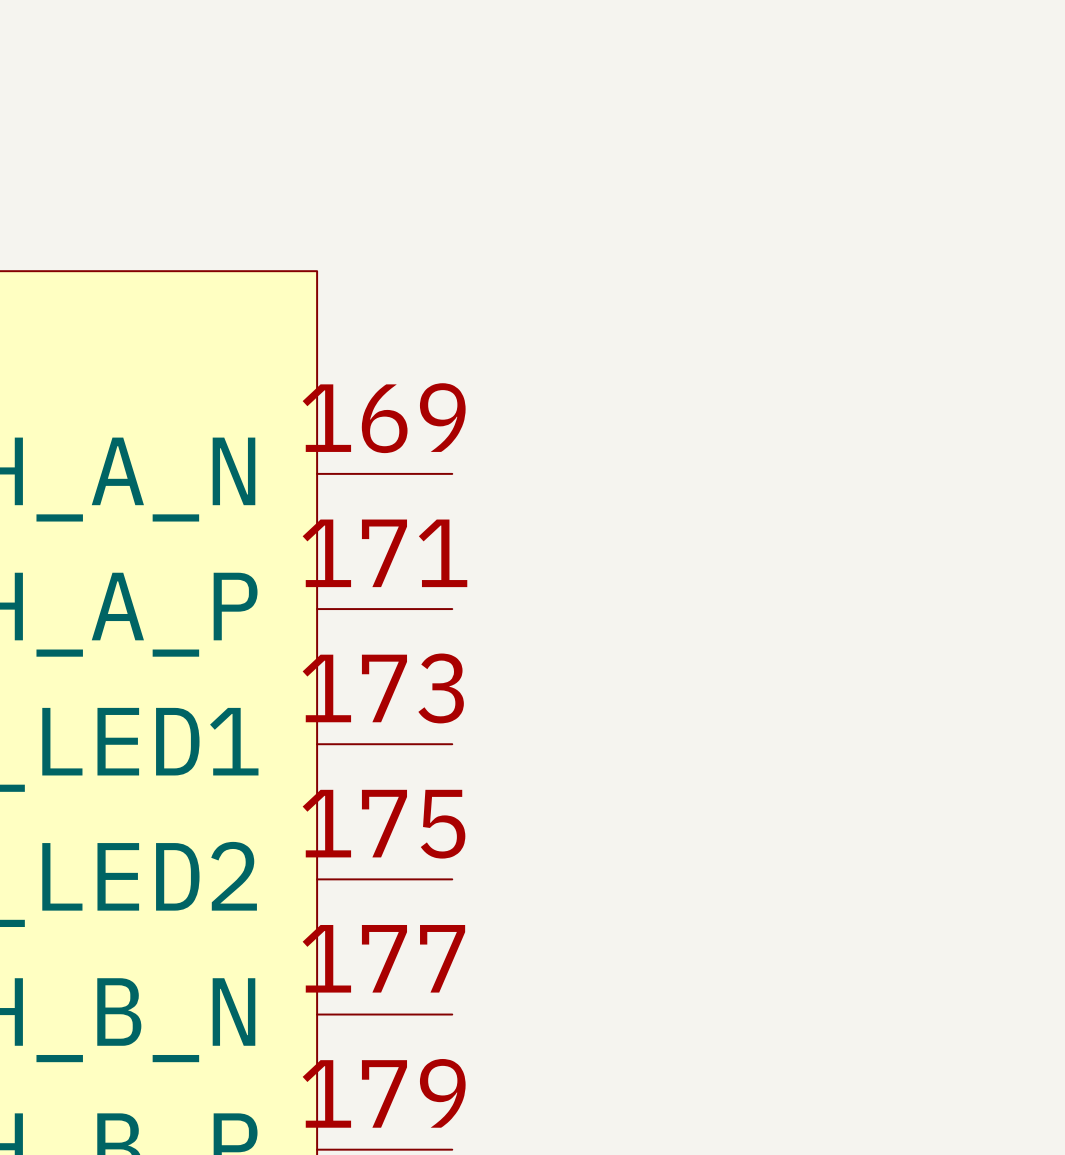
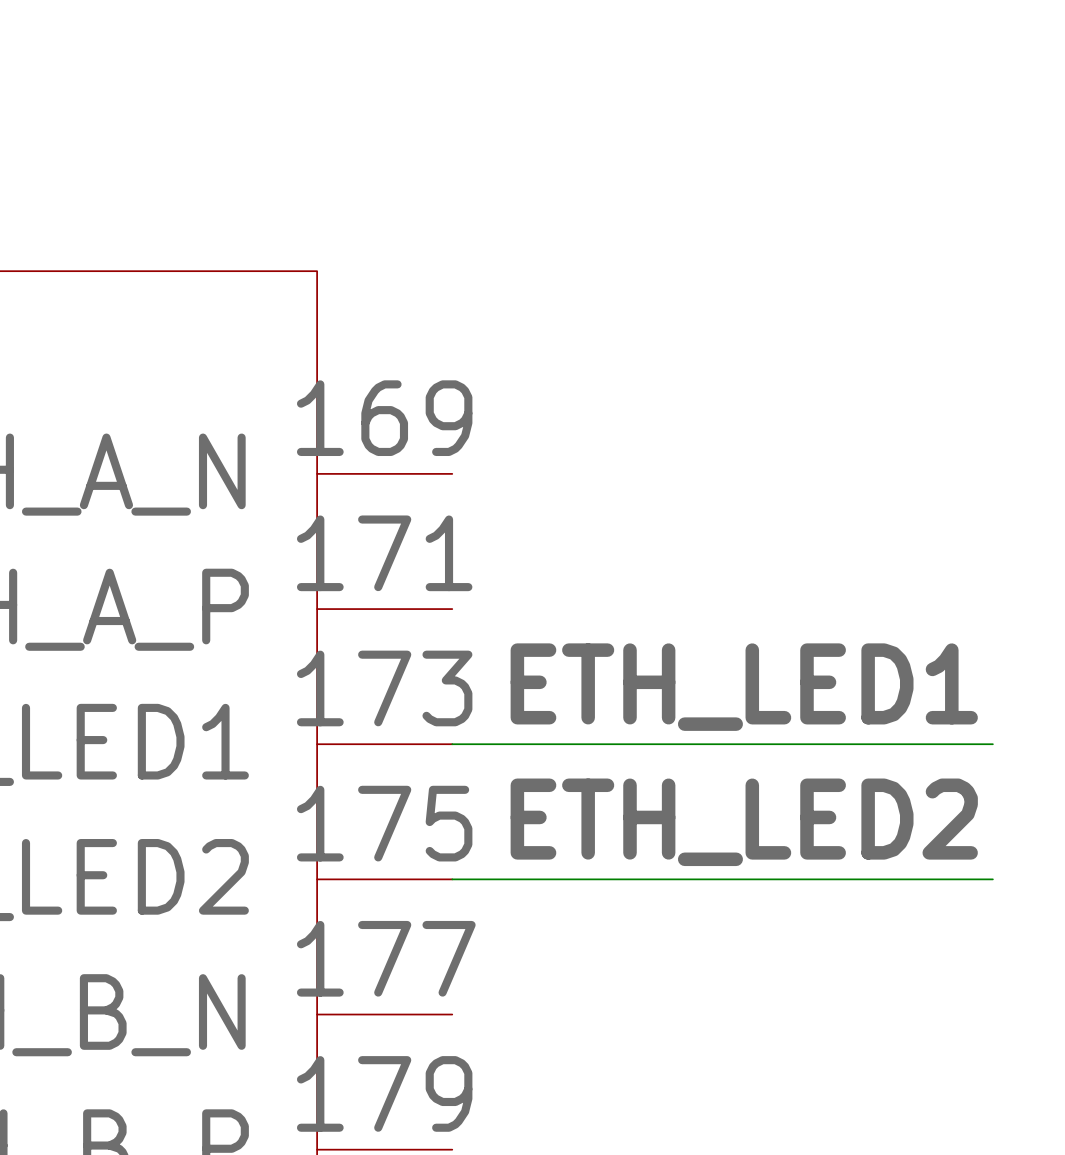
label: none -> ETH_LED1 (744, 687)
wire: none -> (452, 744) (992, 744)
label: none -> ETH_LED2 (744, 822)
wire: none -> (452, 879) (992, 879)

